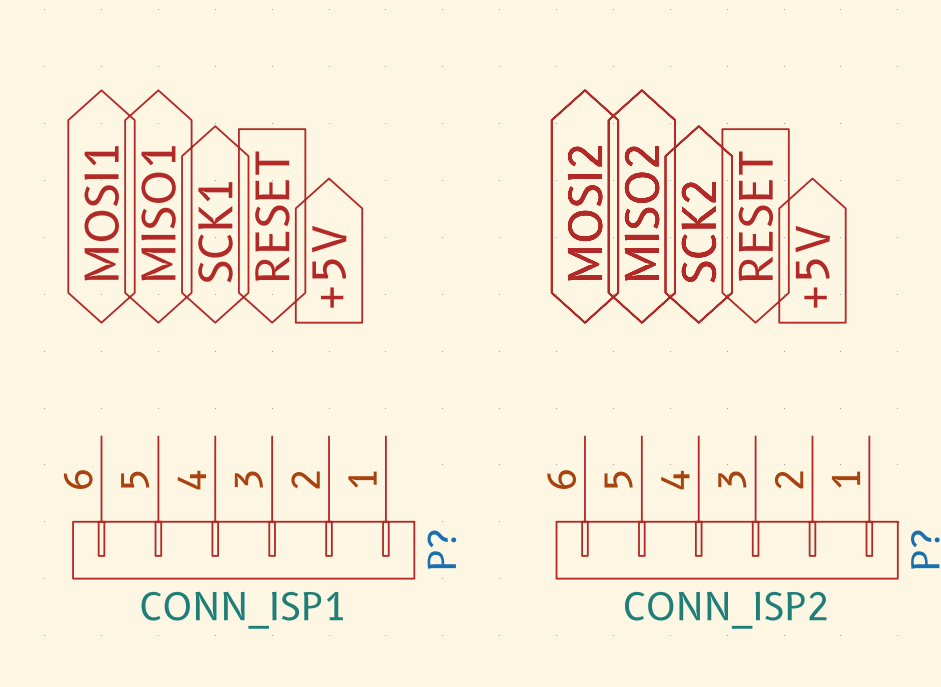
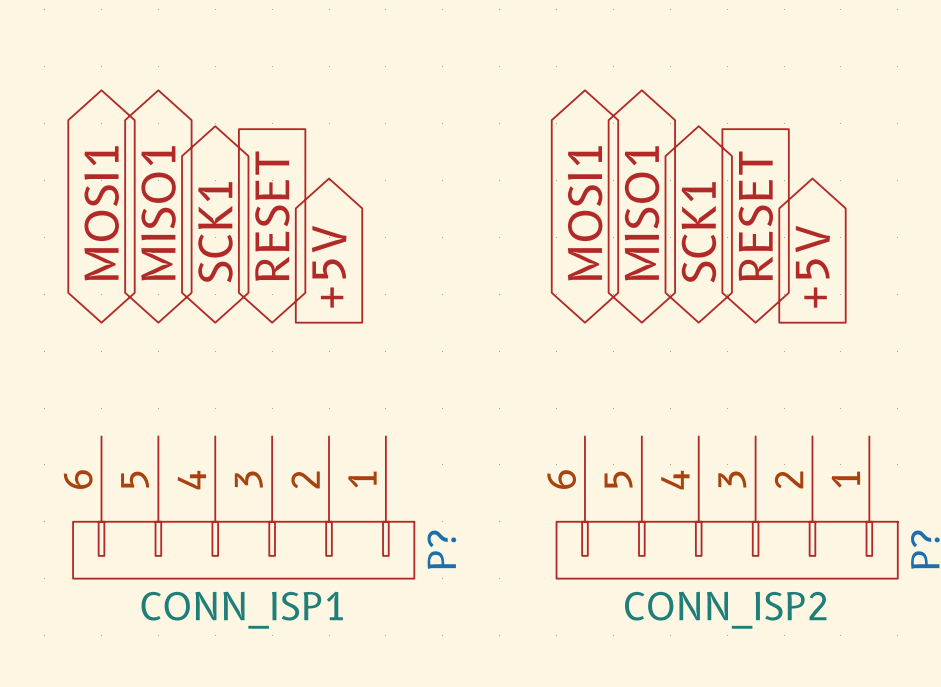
global label: MOSI2 (585, 213) -> MOSI1 (585, 213)
global label: MISO2 (642, 213) -> MISO1 (642, 213)
global label: SCK2 (698, 232) -> SCK1 (698, 232)

